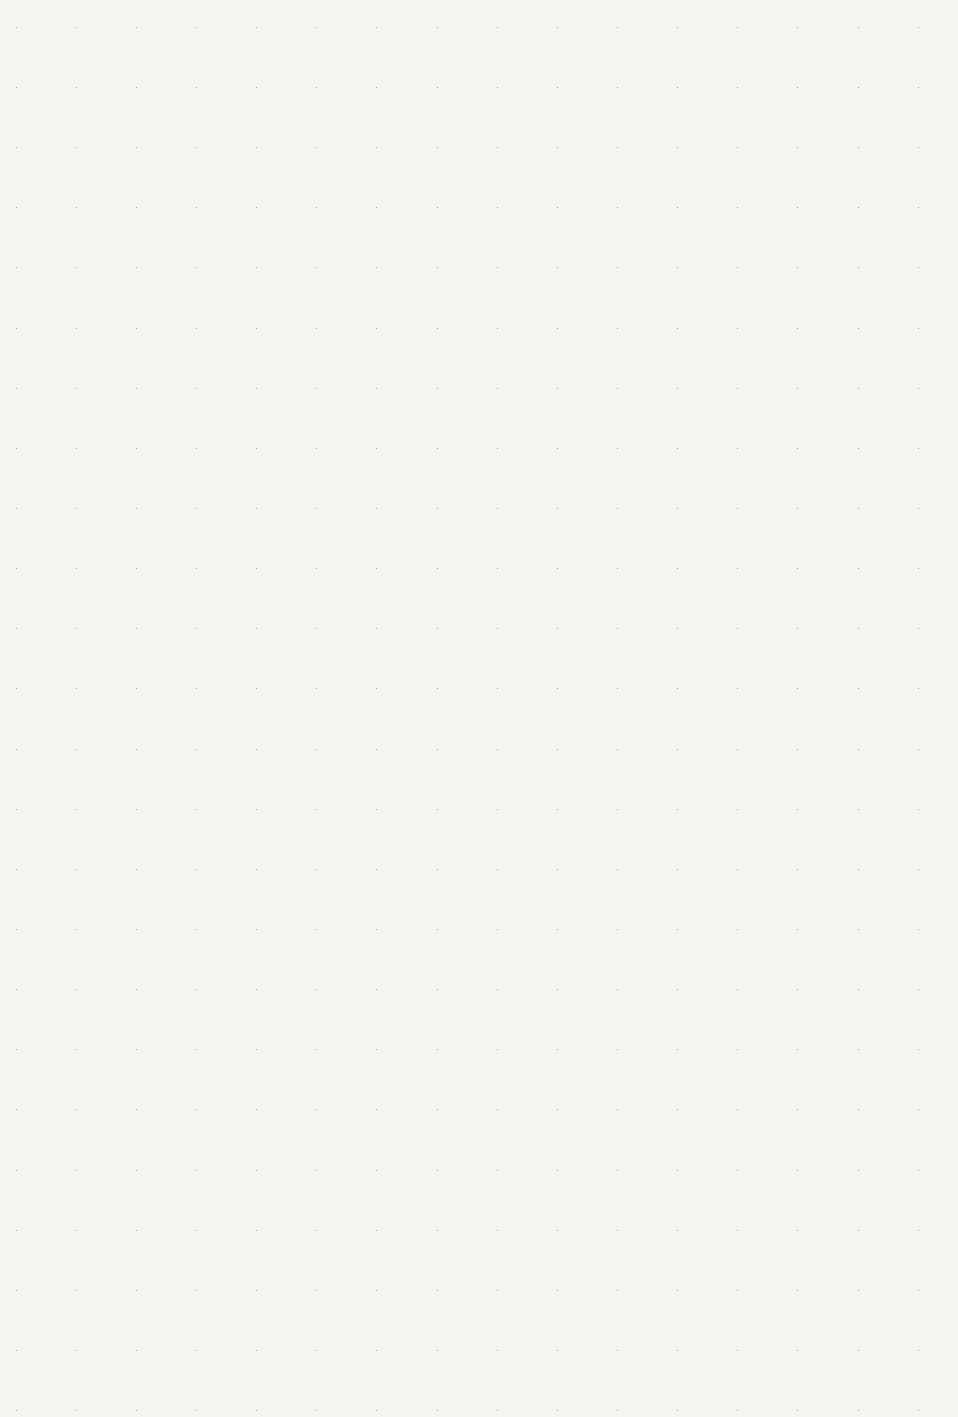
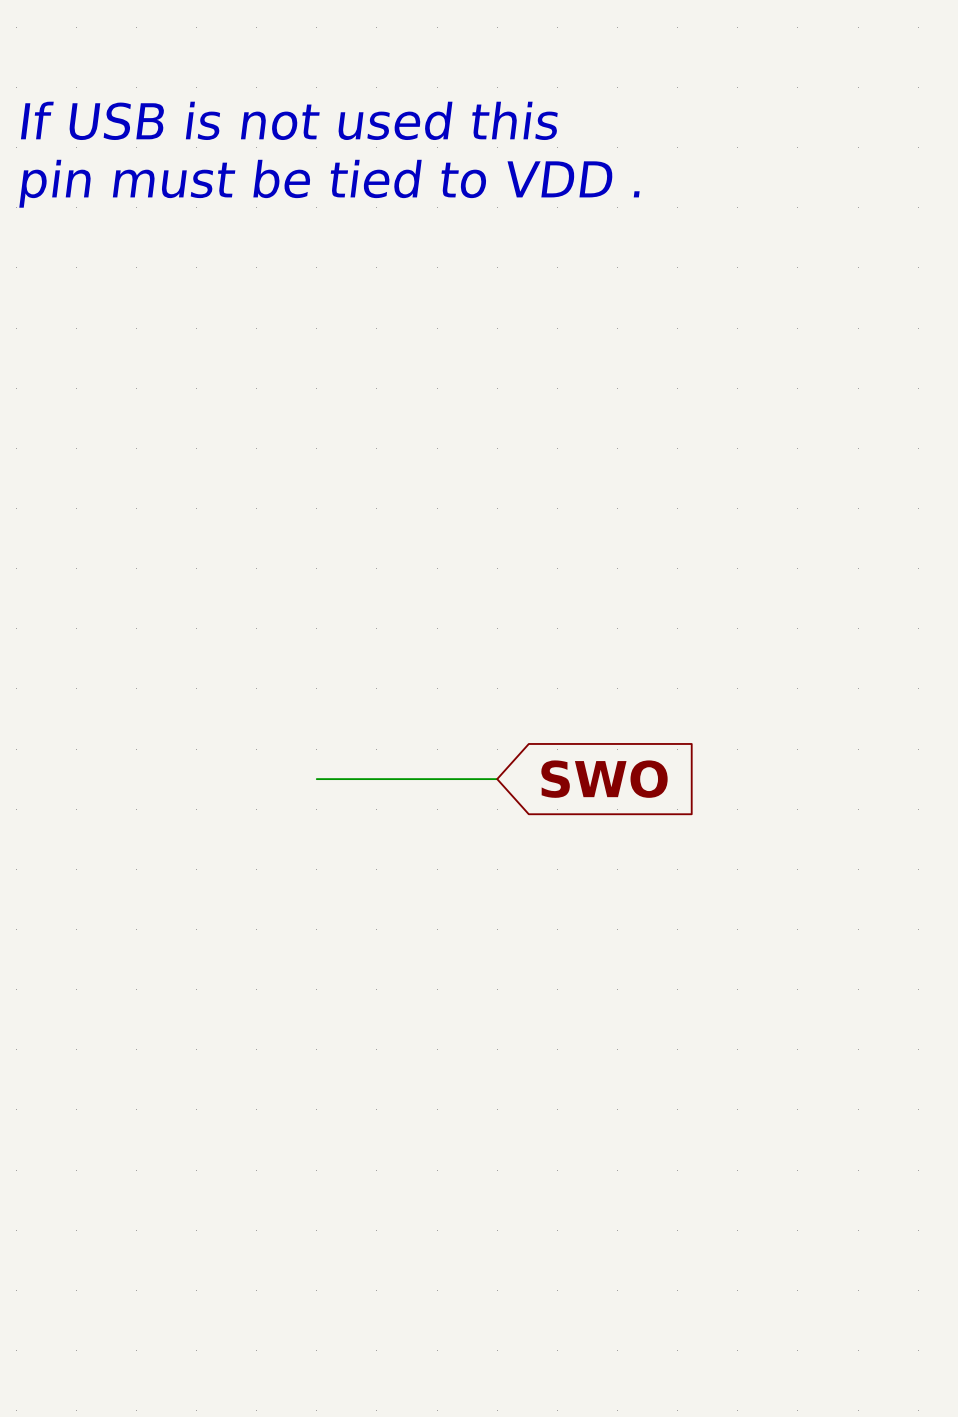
text: none -> If USB is not used this (289, 120)
text: none -> pin must be tied to VDD . (329, 183)
wire: none -> (316, 779) (497, 779)
global label: none -> SWO (604, 779)

